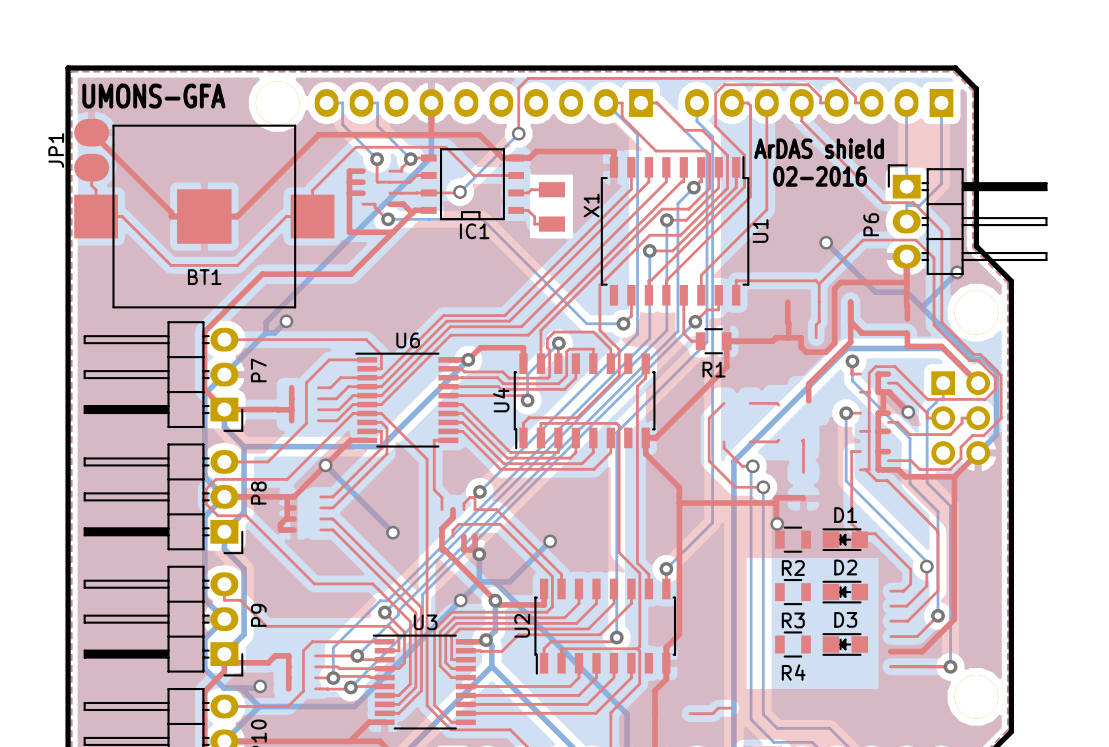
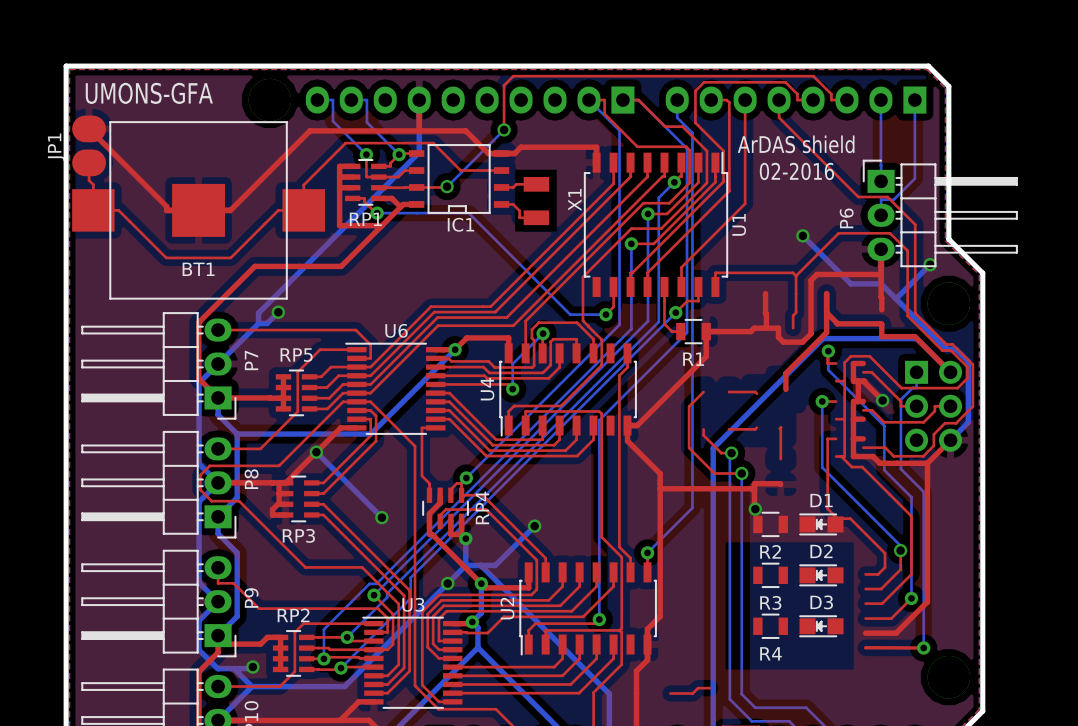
RP1: none -> (365, 182)
RP5: none -> (296, 392)
RP3: none -> (298, 498)
RP4: none -> (445, 508)
RP2: none -> (293, 653)

